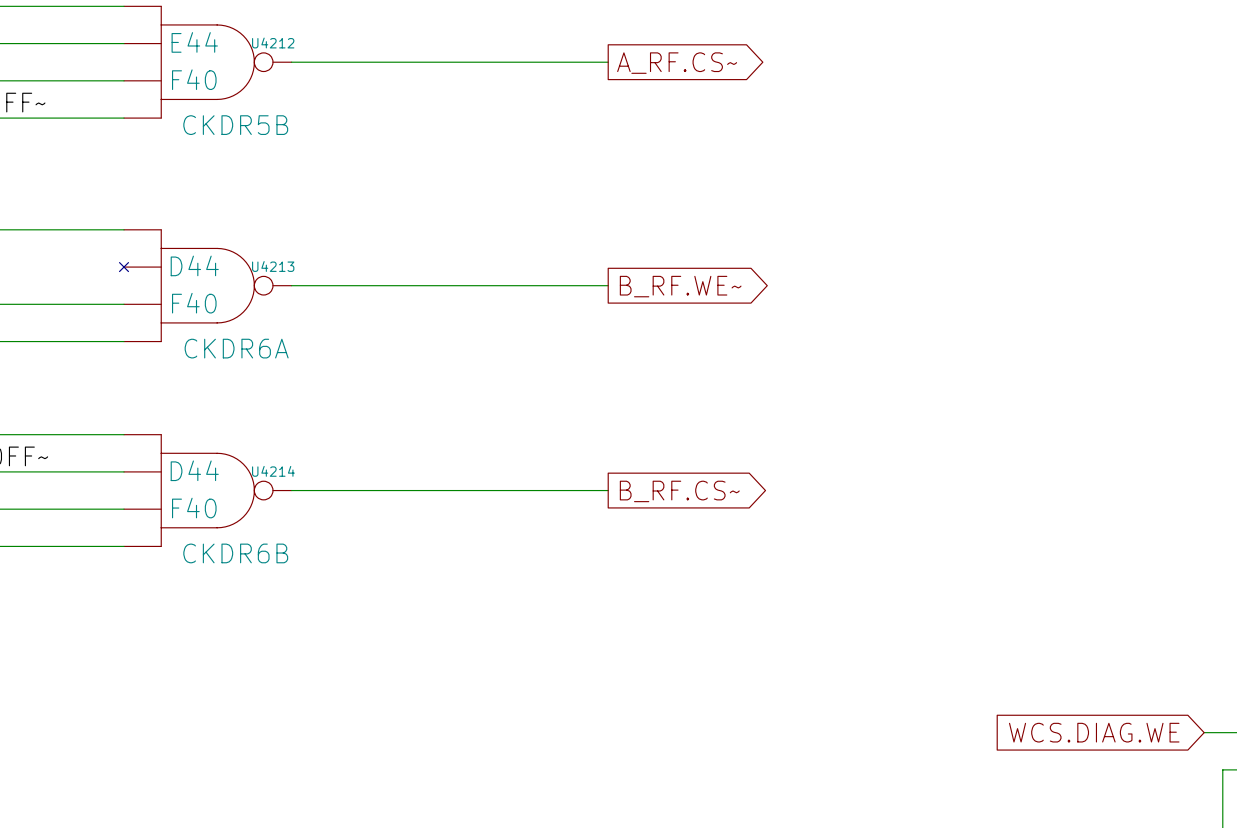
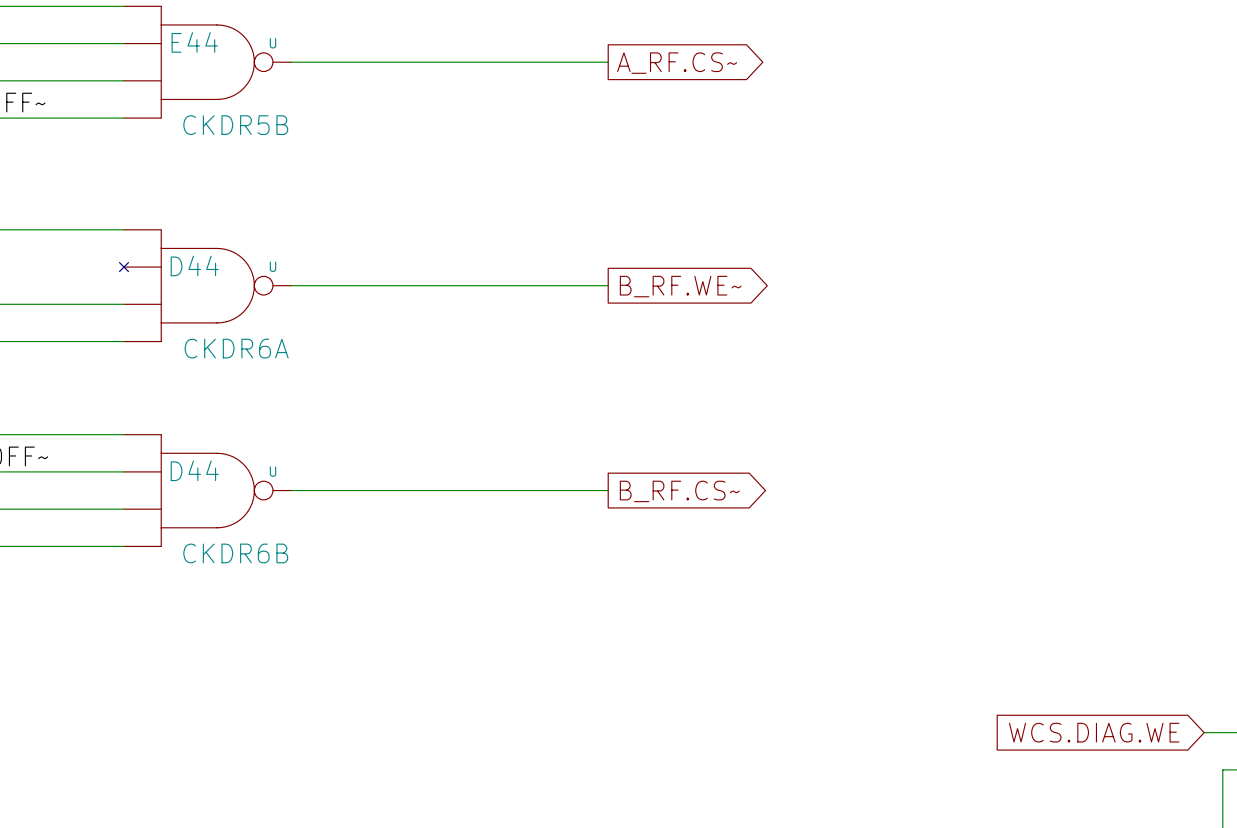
U4212 name: U4212 (273, 43) -> U (272, 43)
U4212 value: F40 (194, 79) -> none
U4213 name: U4213 (273, 266) -> U (272, 266)
U4213 value: F40 (194, 303) -> none
U4214 name: U4214 (273, 471) -> U (272, 471)
U4214 value: F40 (194, 508) -> none

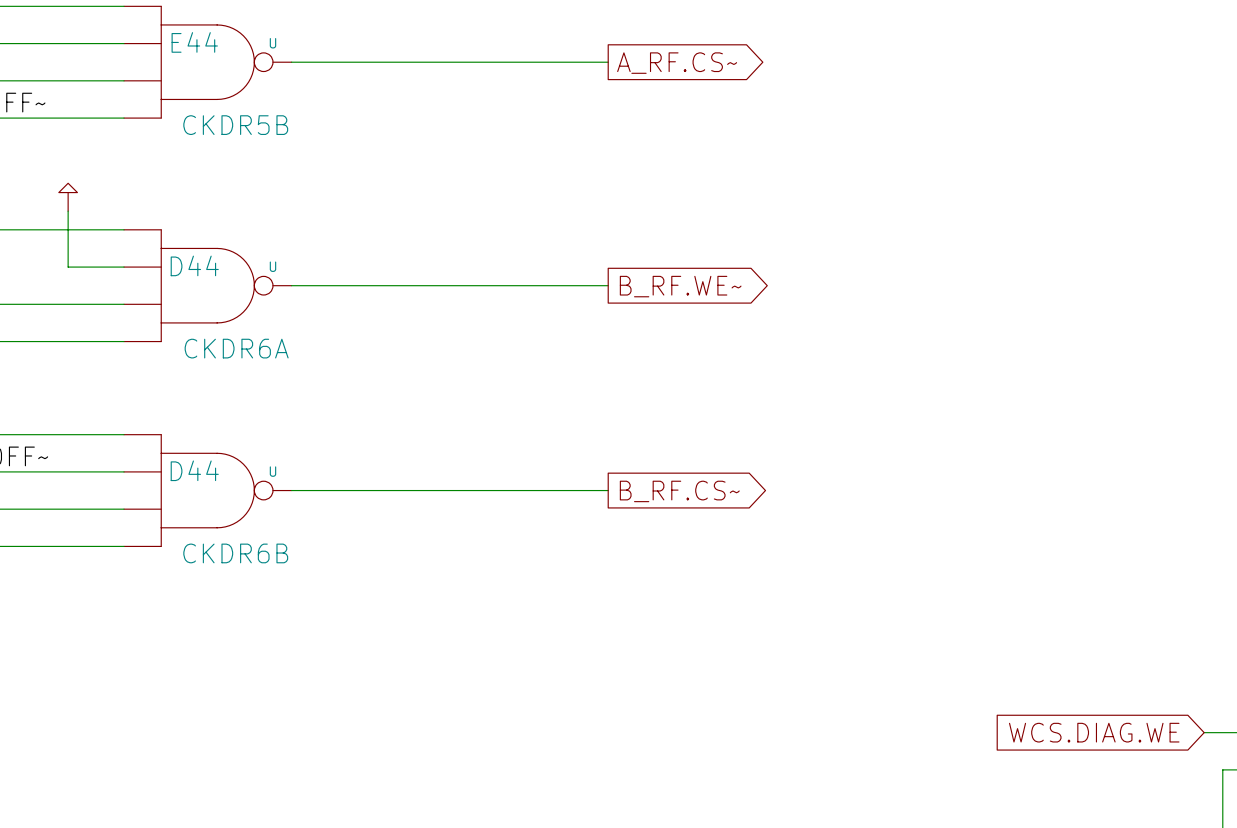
power symbol: none -> (68, 196)
wire: none -> (68, 211) (68, 267) (124, 267)
no-connect mark: (124, 267) -> none

